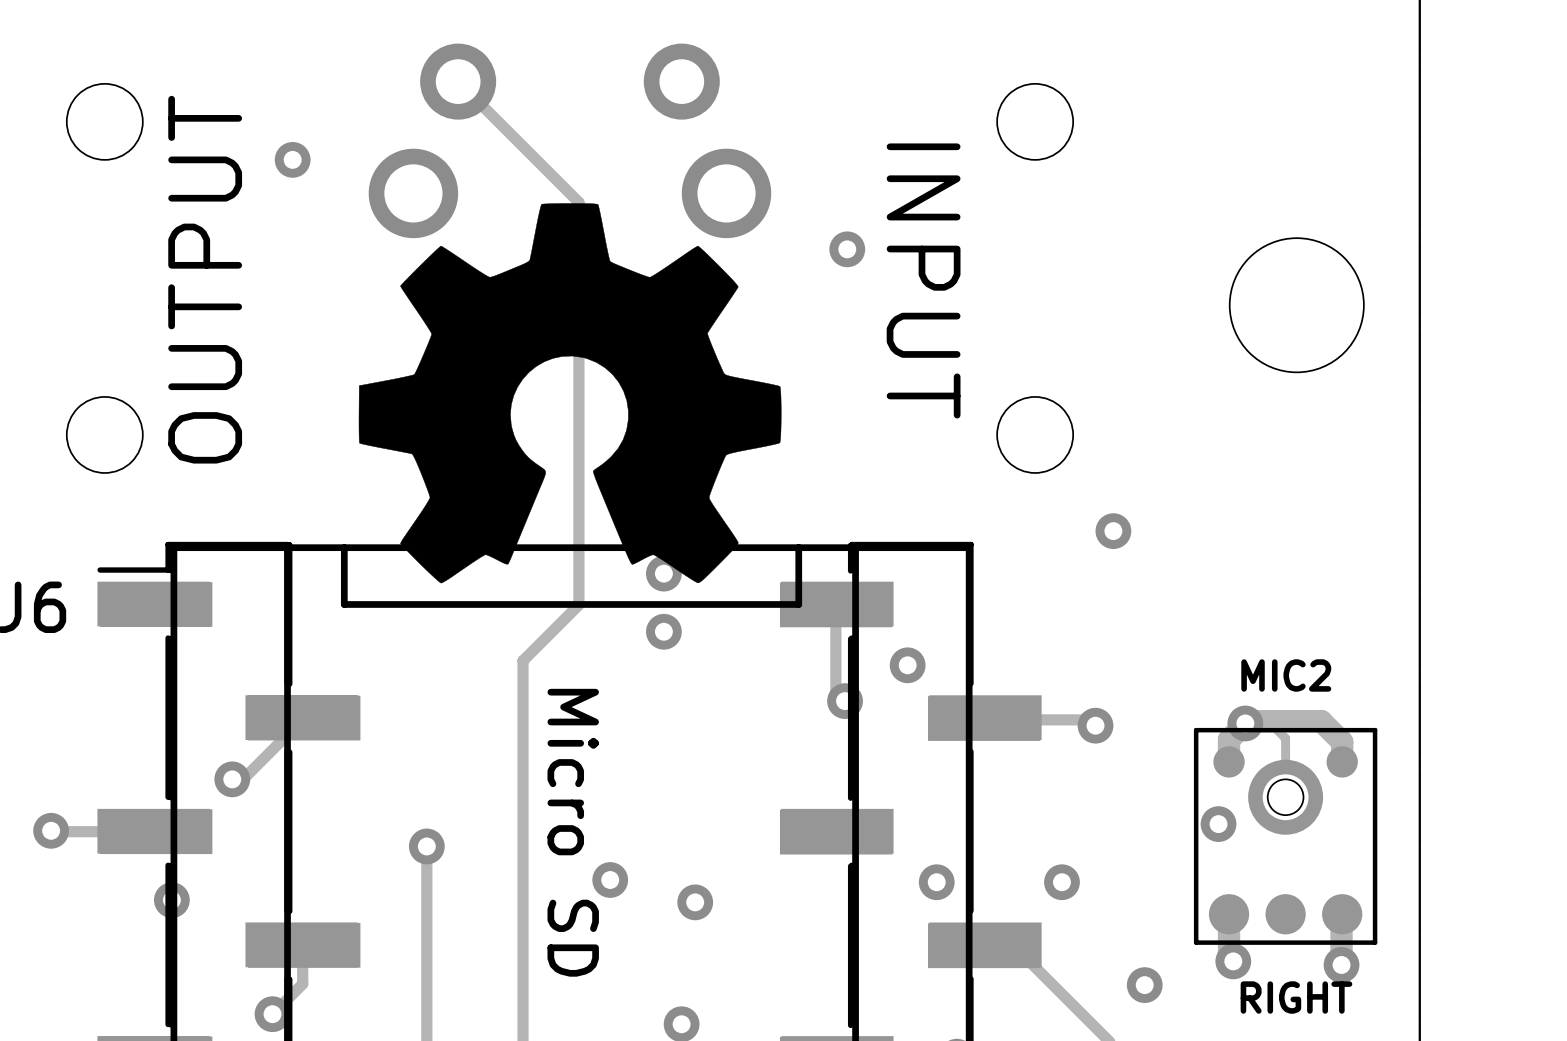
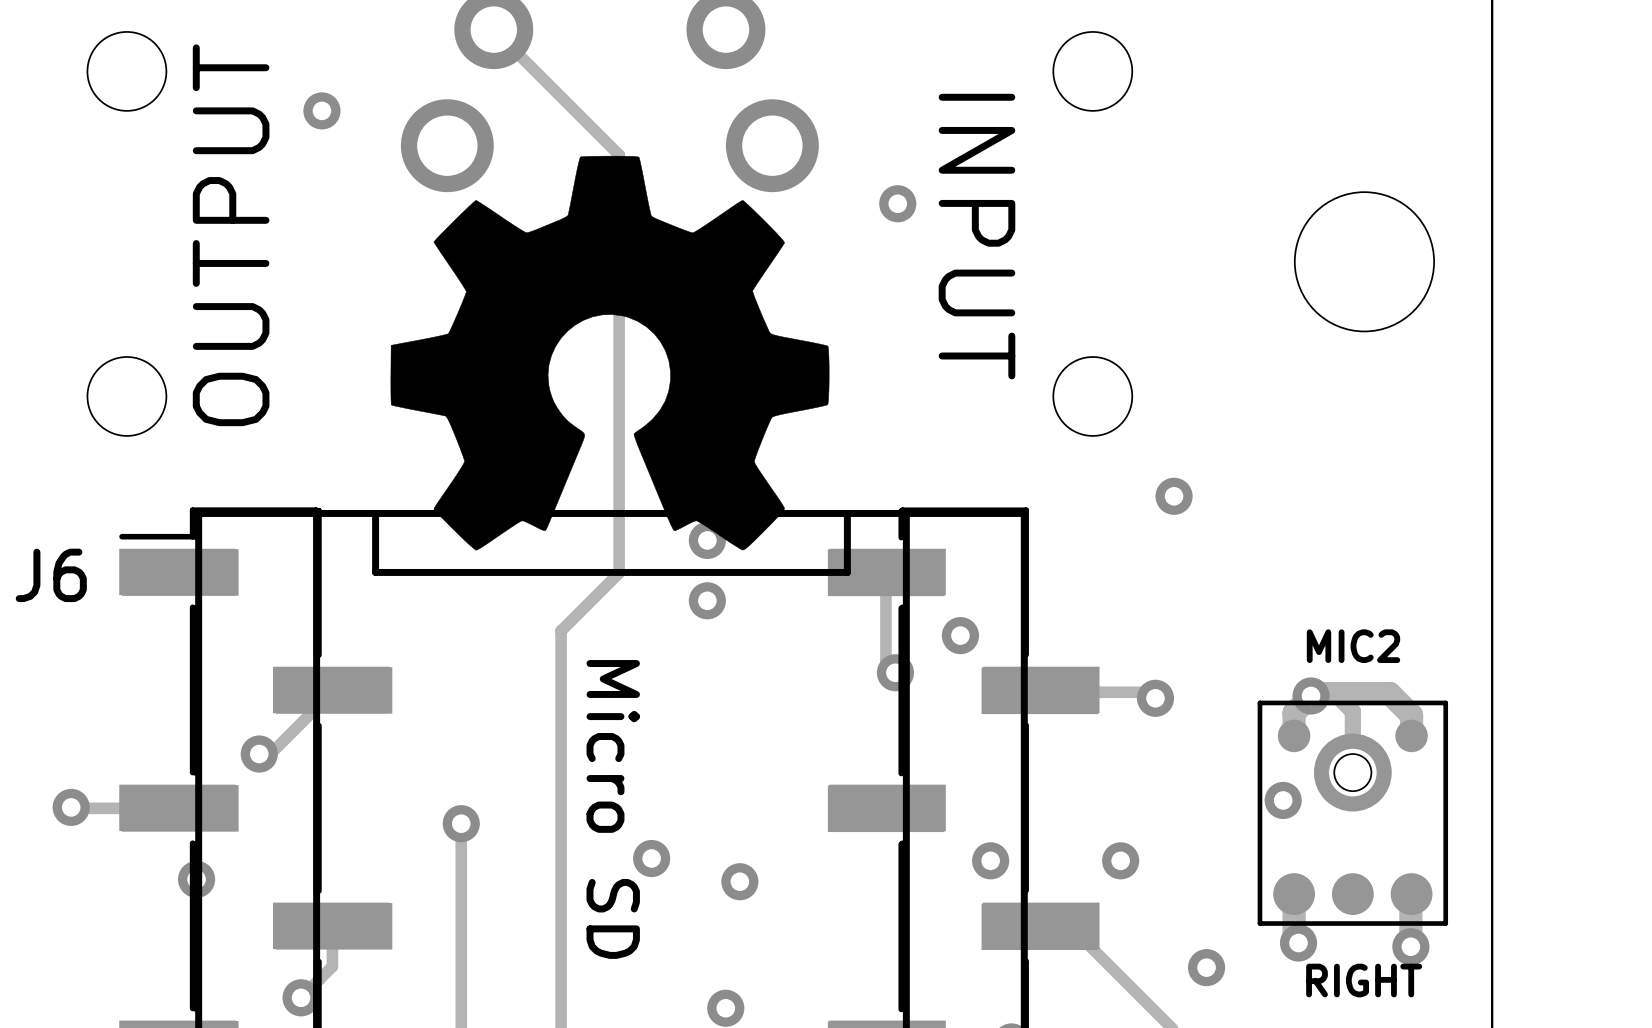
track width: thin (1270, 723) (1285, 738) (1285, 765) -> thick (1337, 695) (1352, 711) (1352, 740)

